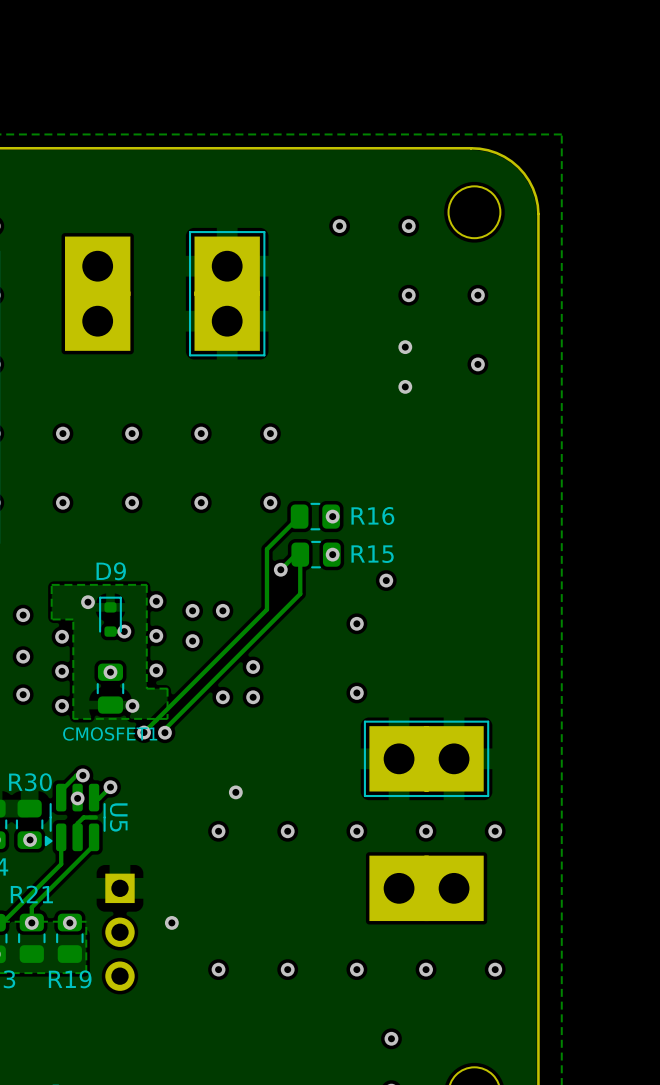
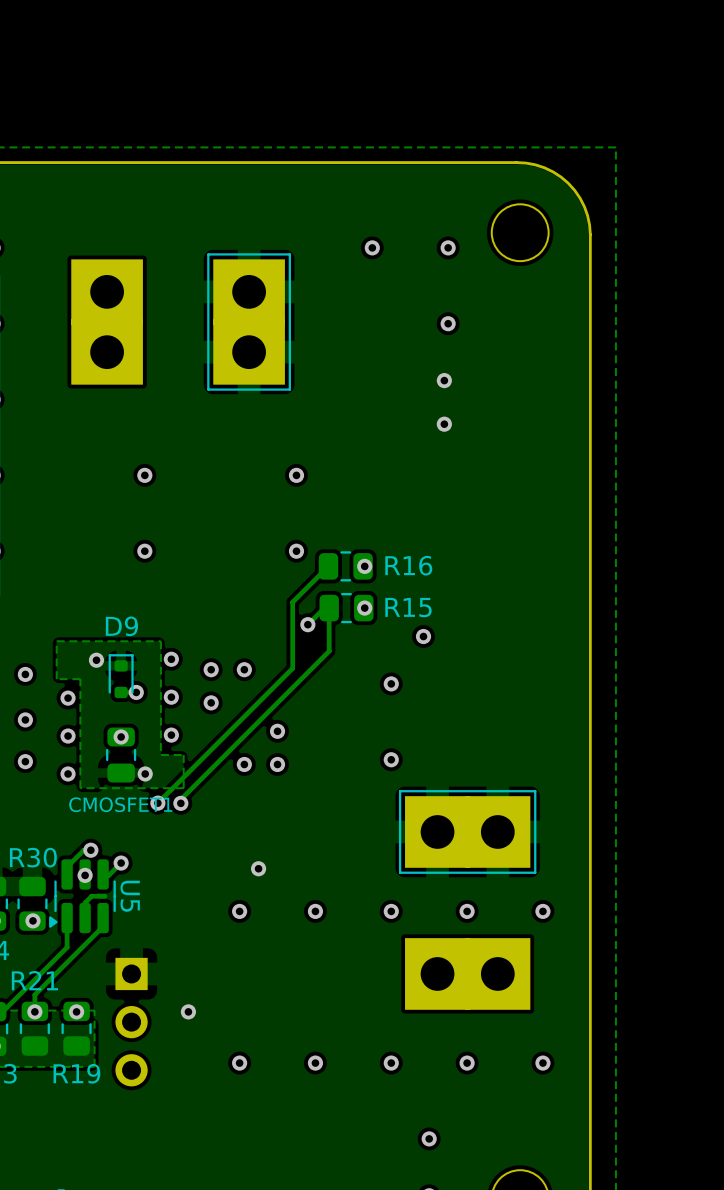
via: (477, 295) -> none
via: (477, 364) -> none
via: (62, 433) -> none
via: (201, 433) -> none
via: (62, 502) -> none
via: (201, 502) -> none

